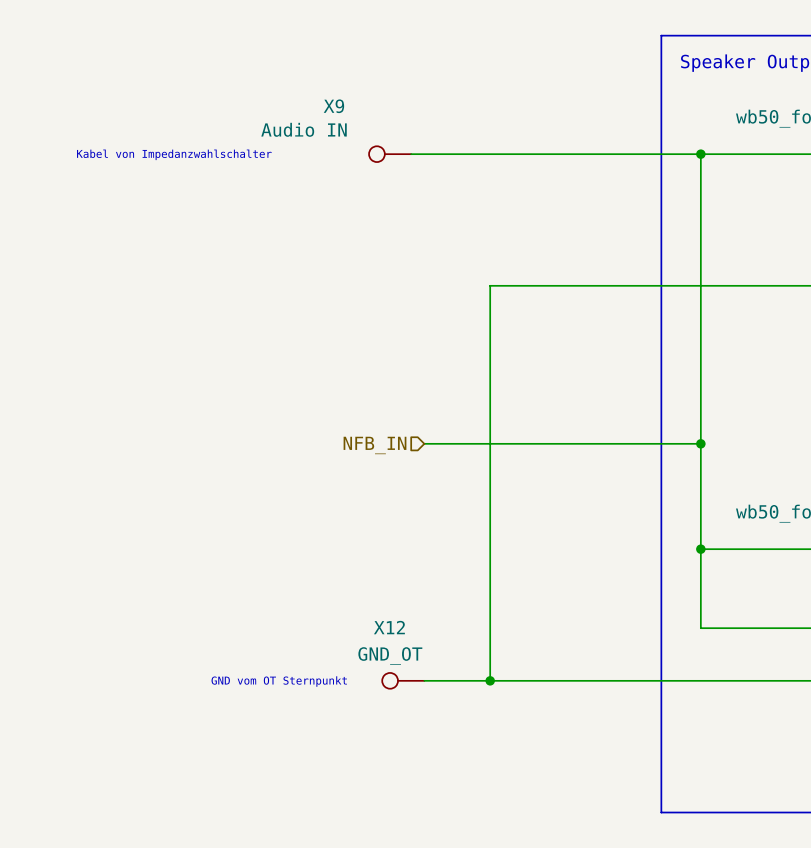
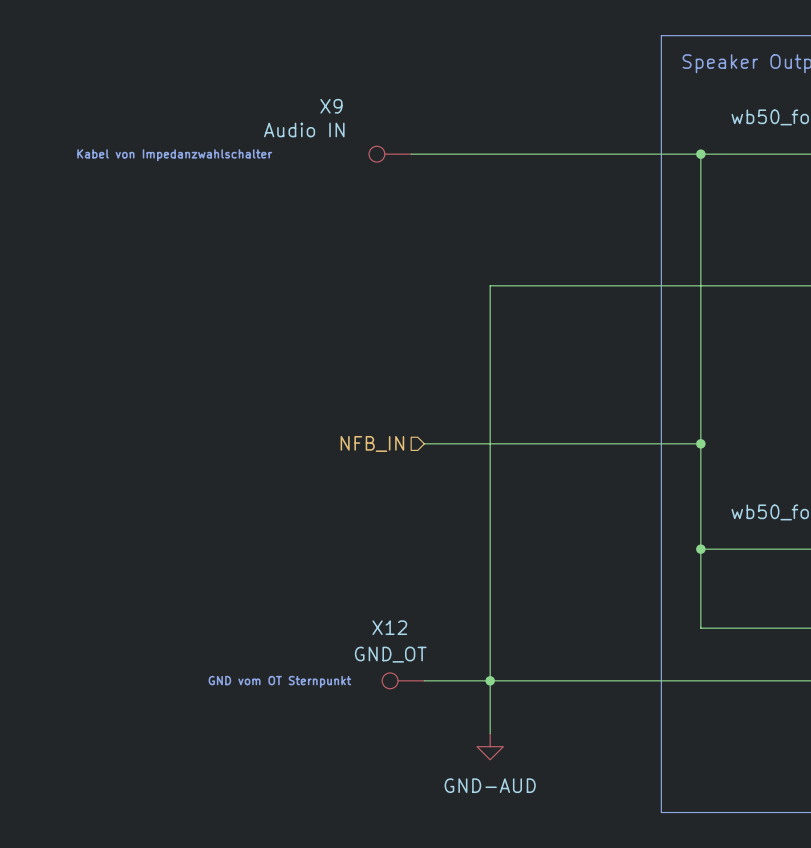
wire: none -> (490, 680) (490, 733)
power symbol: none -> GND-AUD (490, 746)

